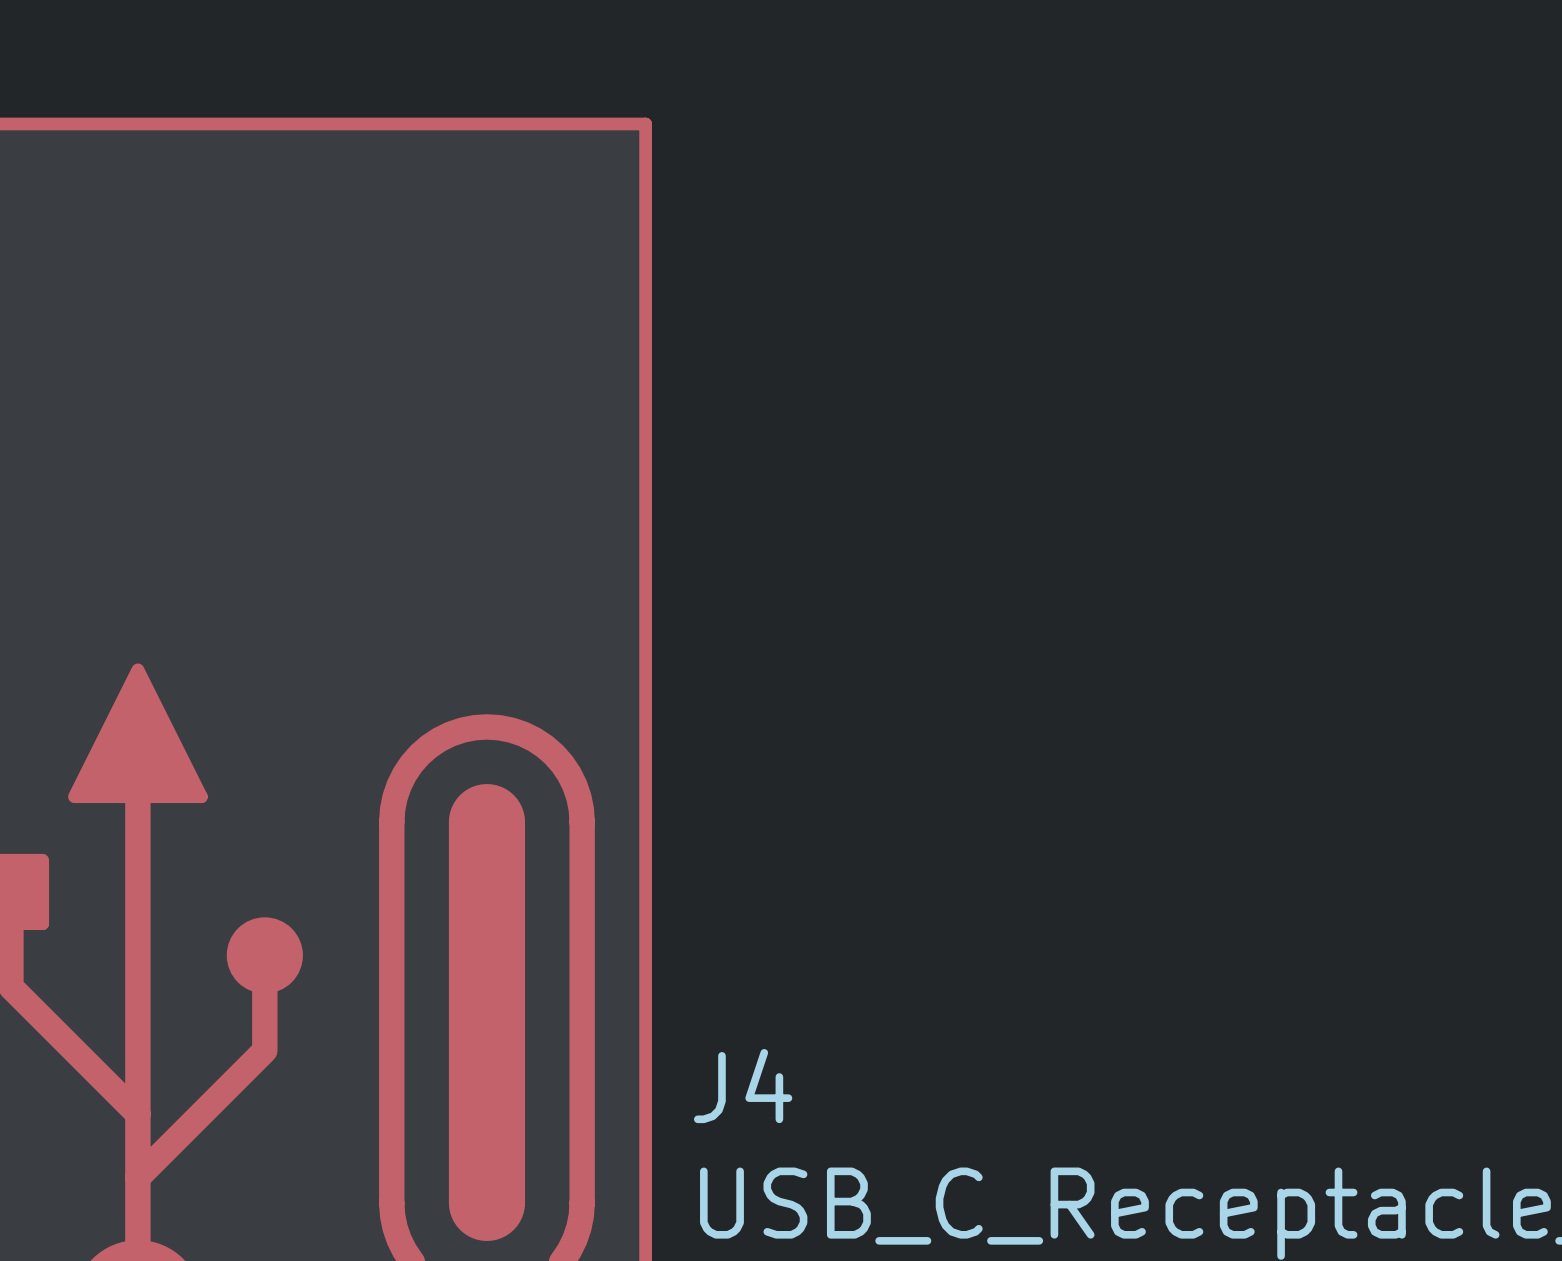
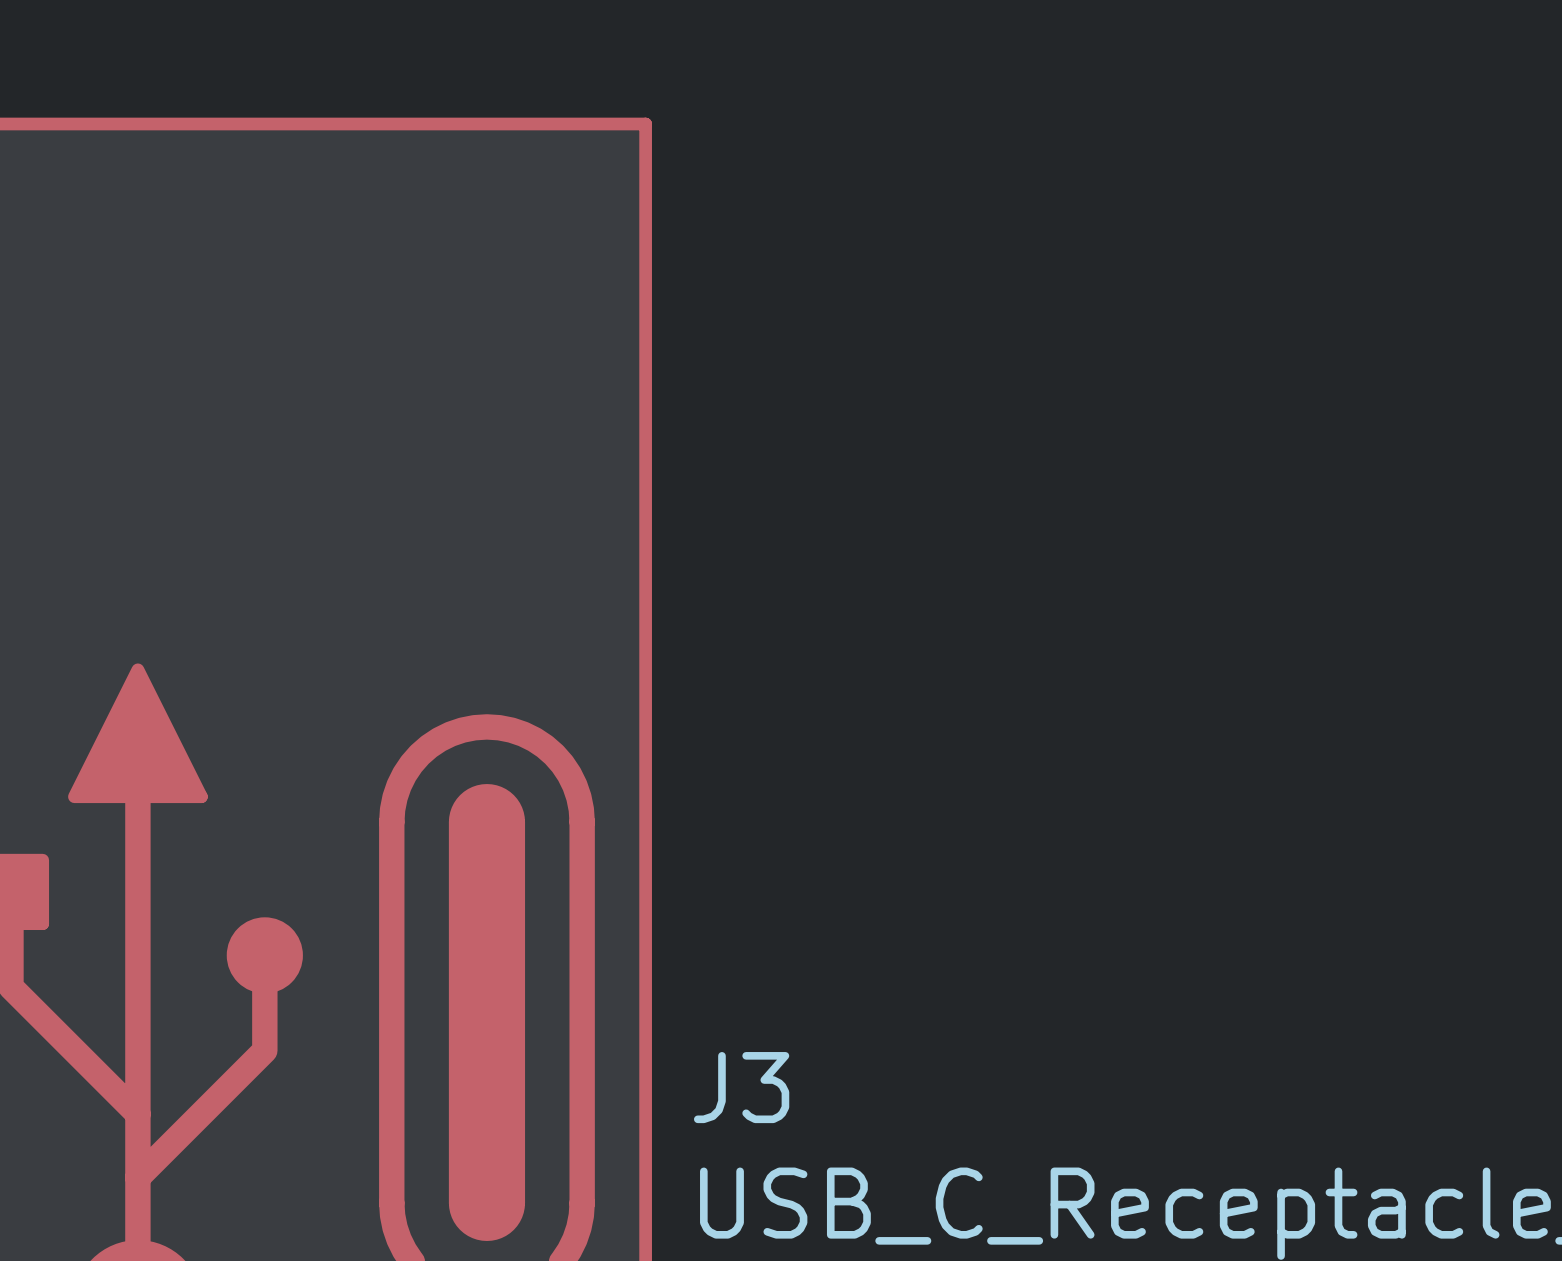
J4 name: J4 (743, 1086) -> J3 (741, 1087)

